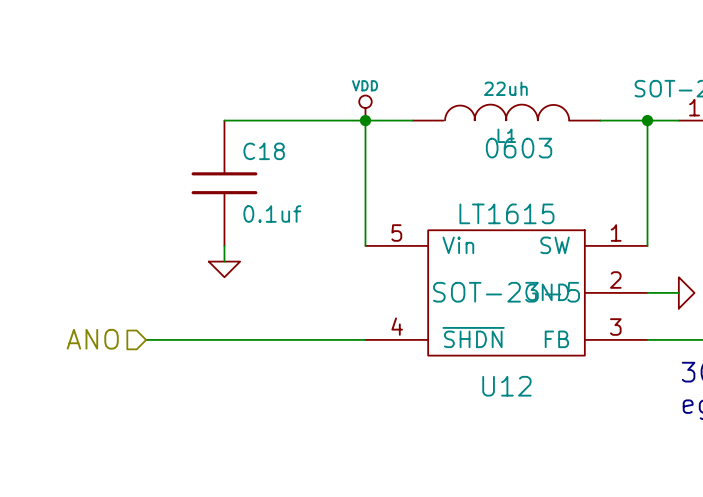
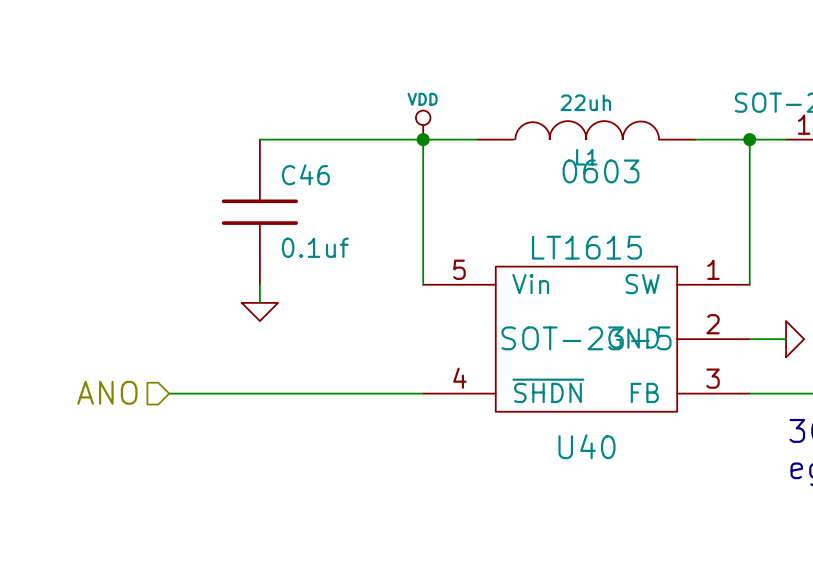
C18 name: C18 (264, 151) -> C46 (305, 174)
U12 name: U12 (506, 386) -> U40 (586, 446)

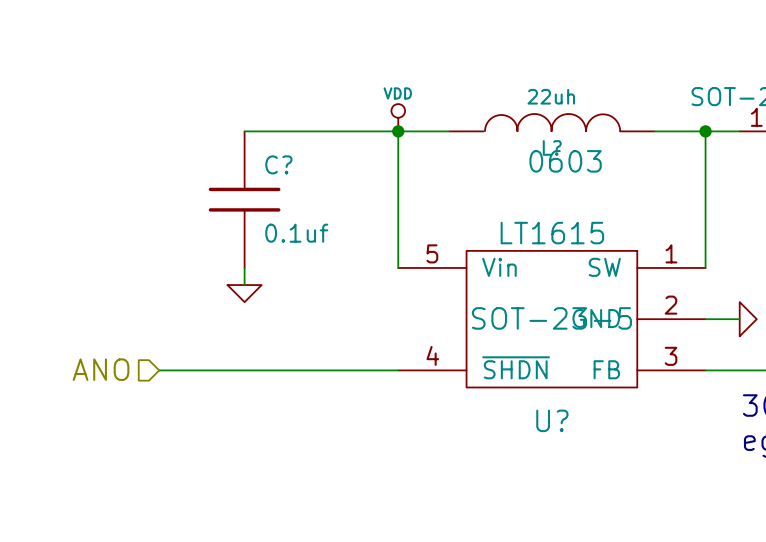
L1 name: L1 (586, 157) -> L? (552, 147)
C46 name: C46 (305, 174) -> C? (278, 164)
U40 name: U40 (586, 446) -> U? (552, 420)

